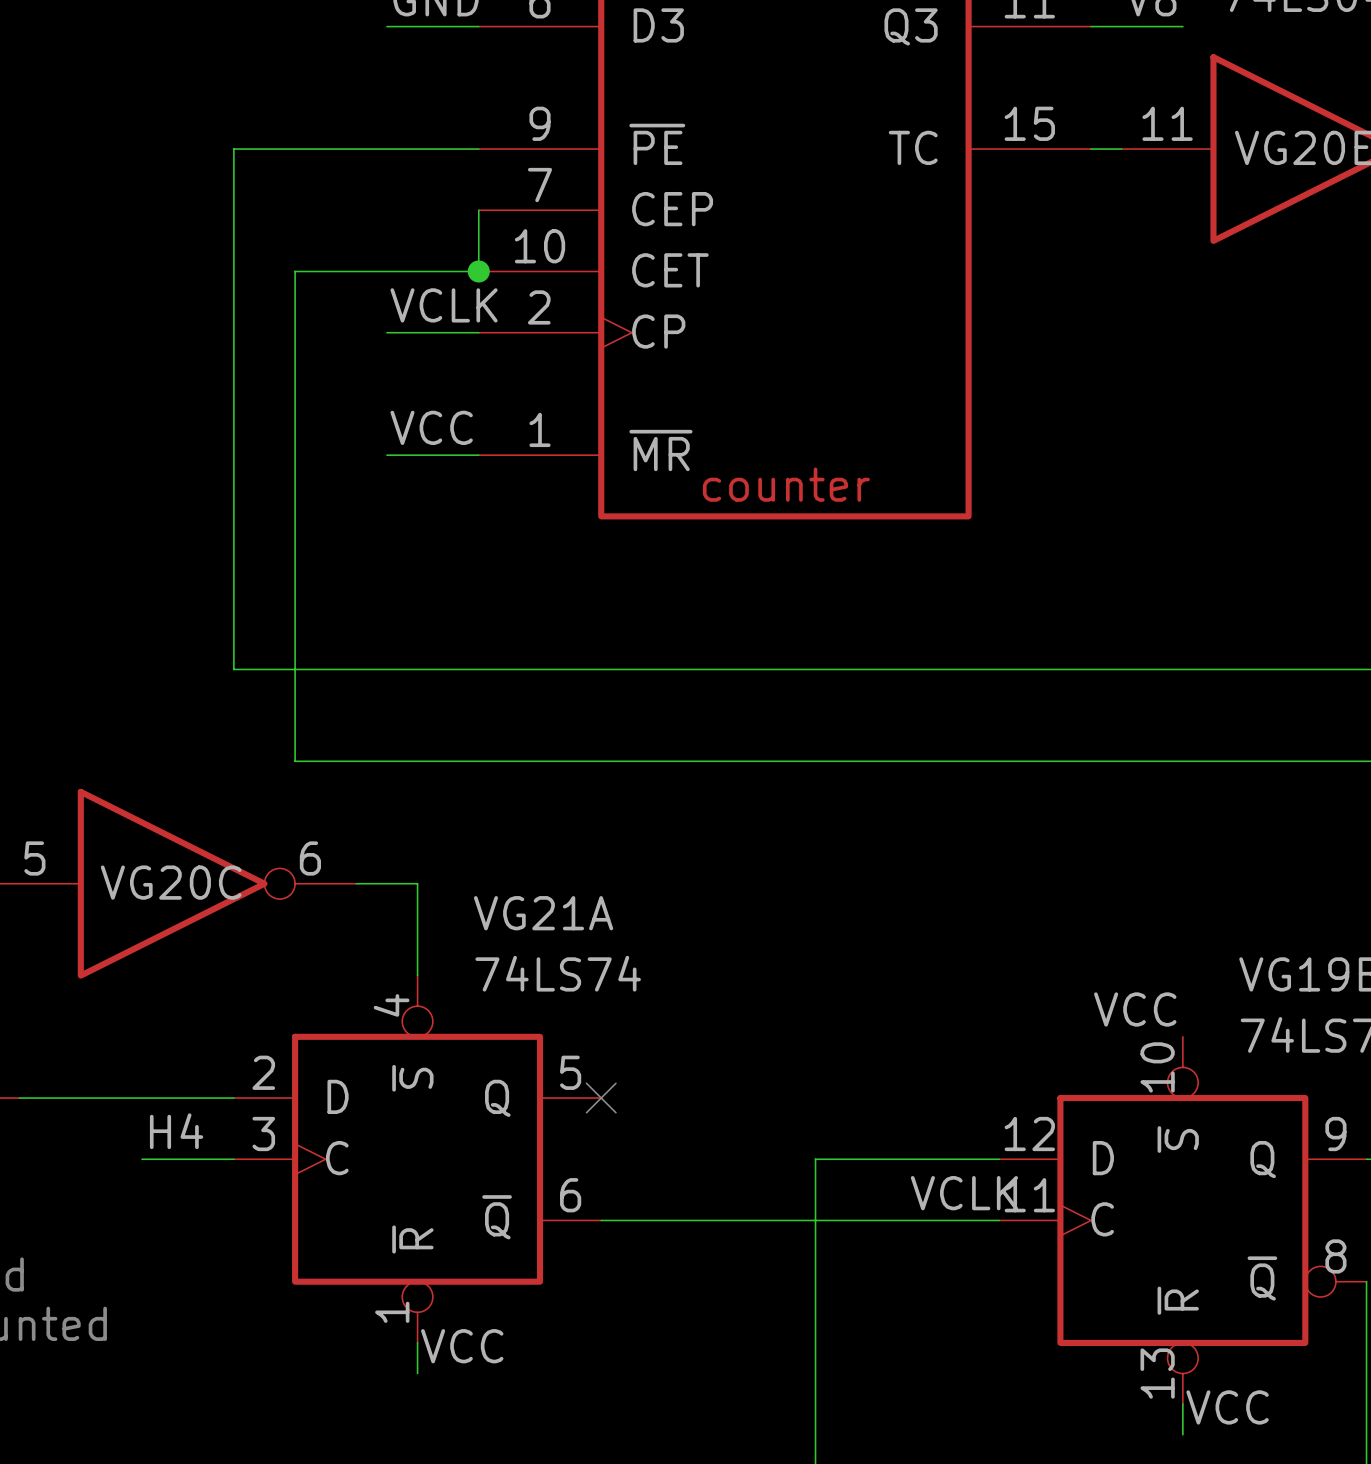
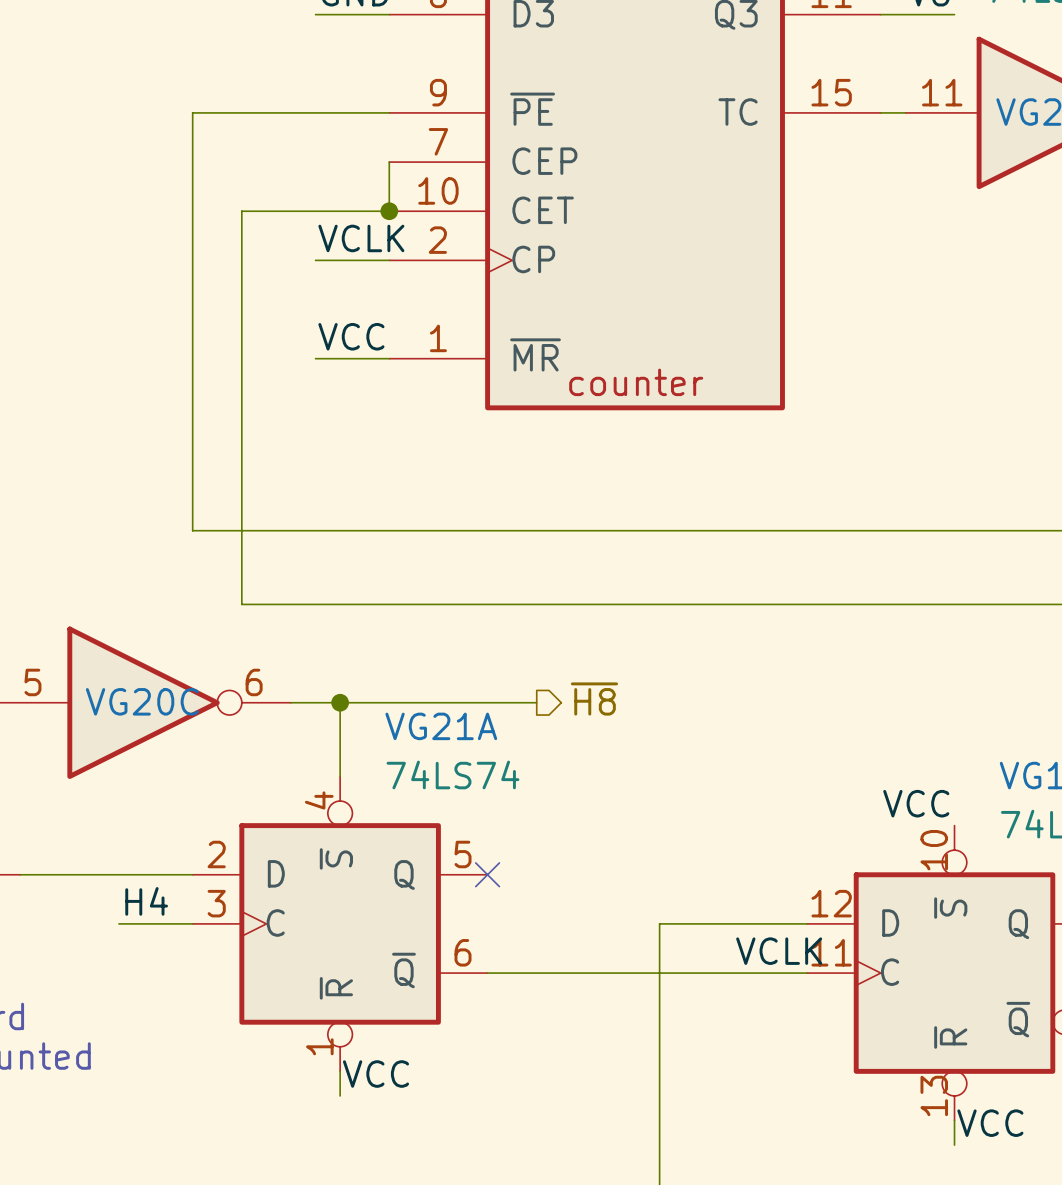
hierarchical label: none -> ~{H8} (594, 698)
wire: none -> (340, 702) (536, 702)
junction: none -> (340, 702)

